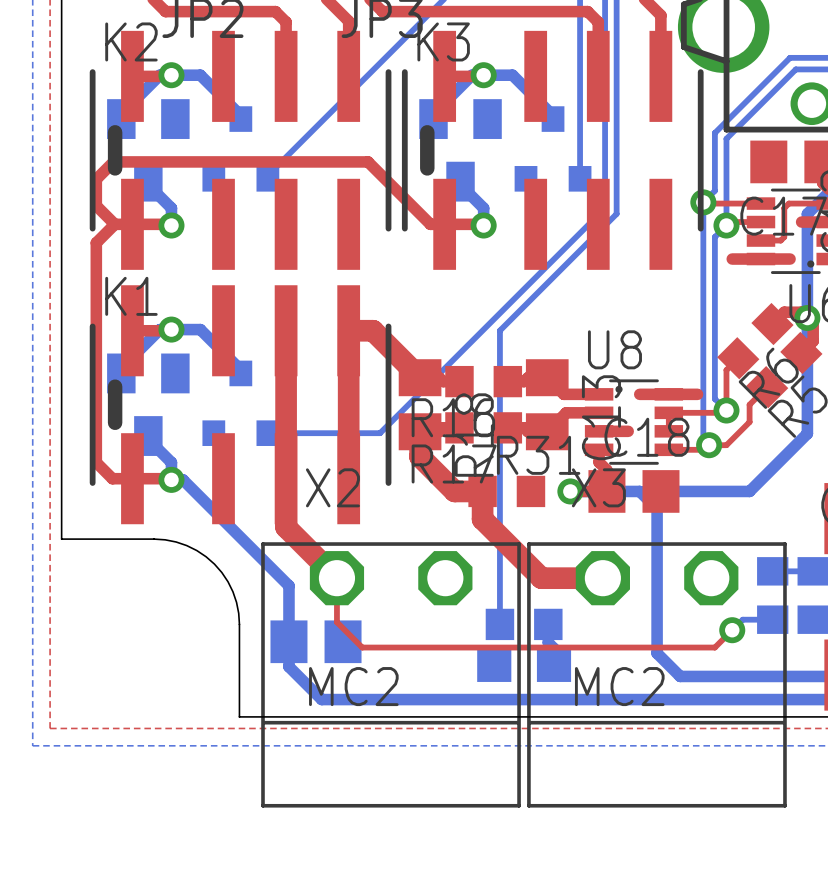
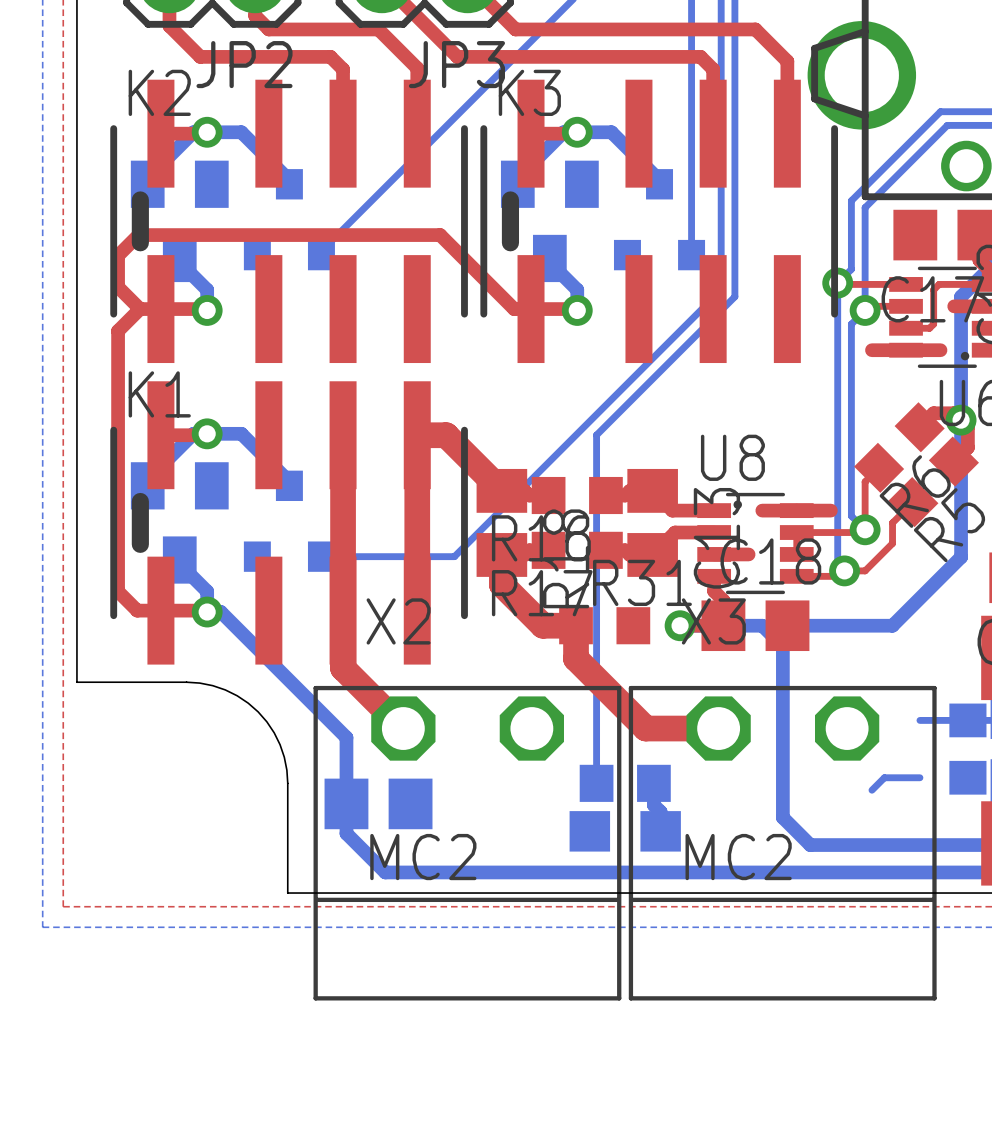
top track: (336, 578) (336, 622) (362, 647) (714, 647) (732, 630) -> none
part: (772, 595) -> none
via: (732, 630) -> none

